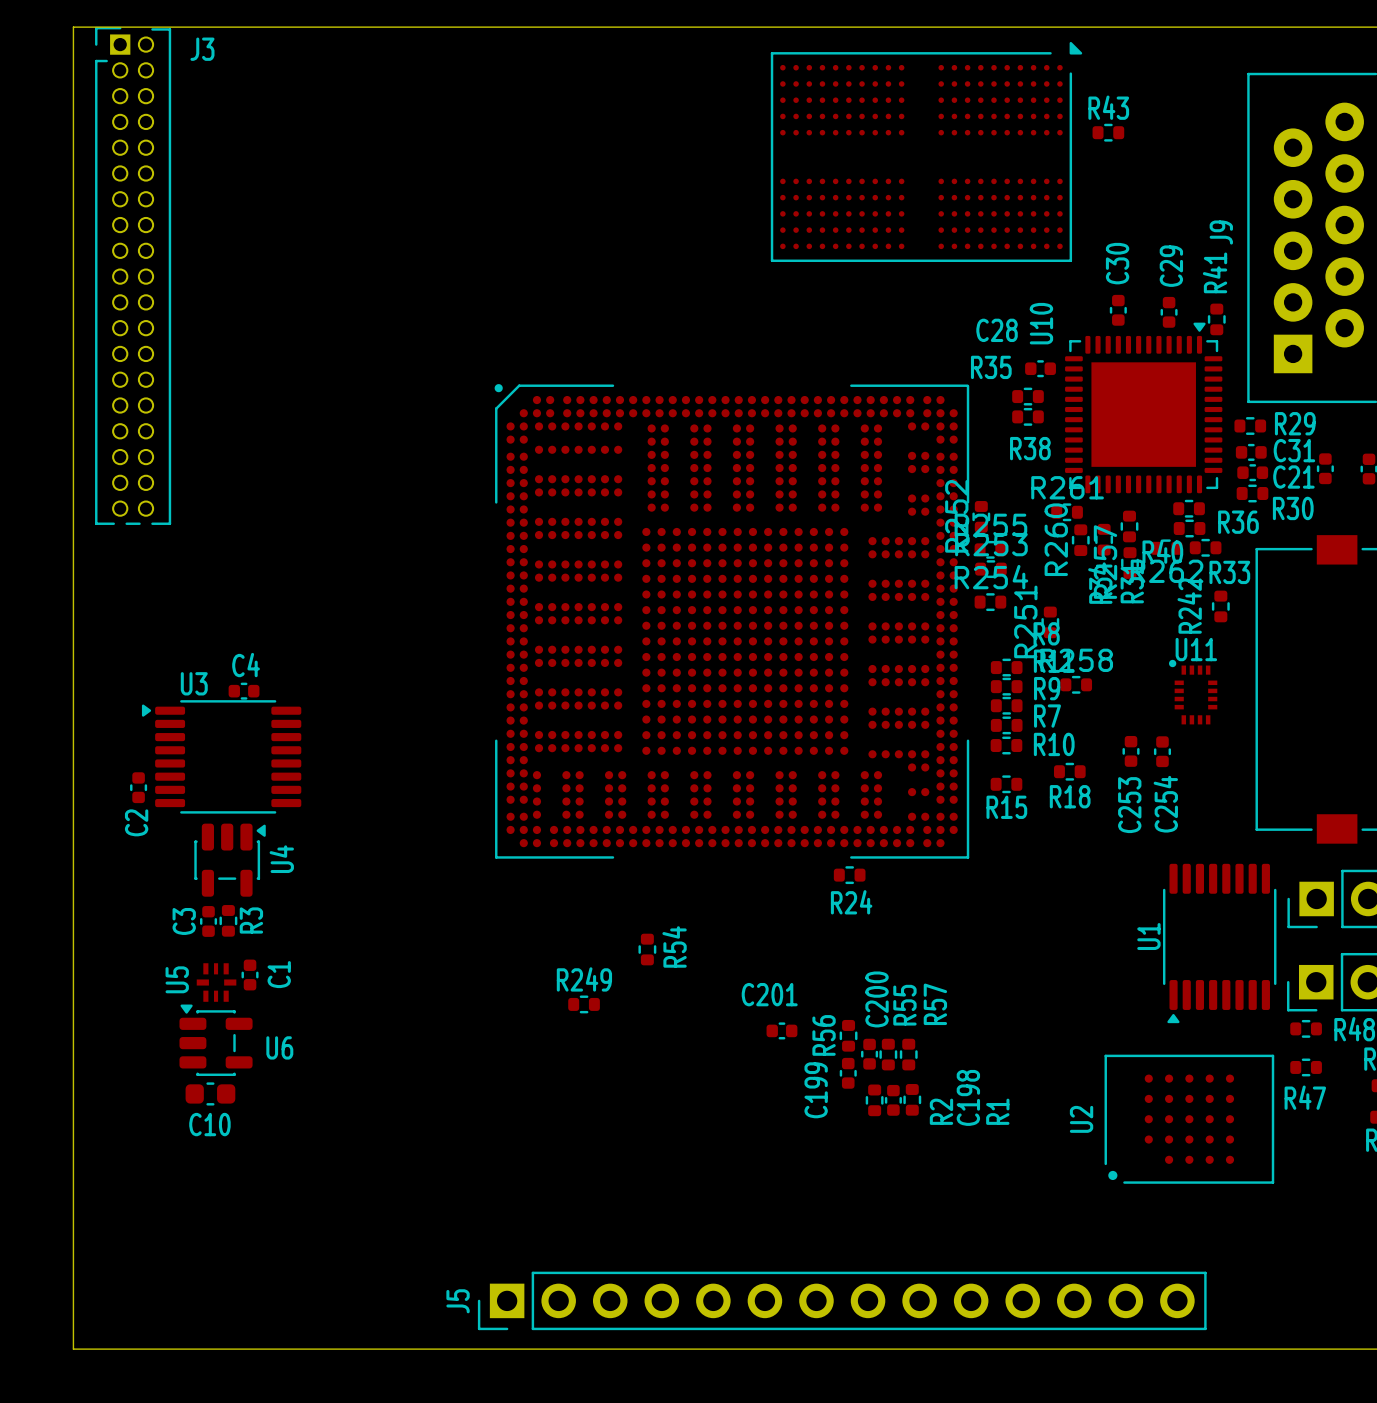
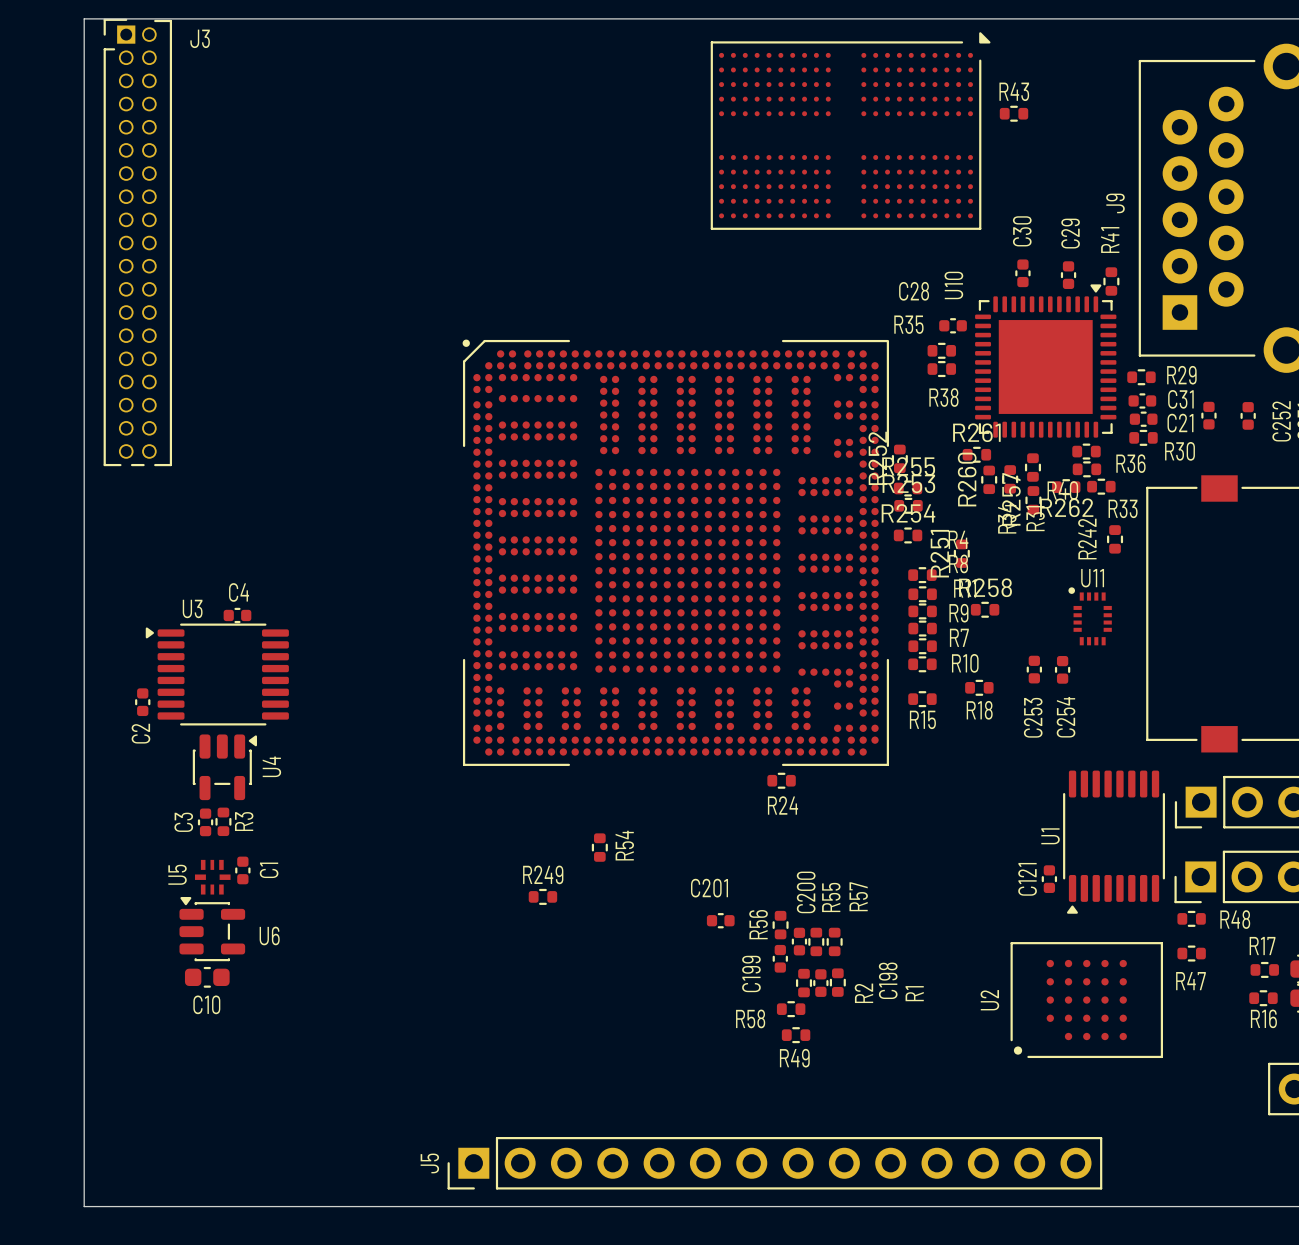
R4: none -> (922, 575)
C121: none -> (1049, 879)
R58: none -> (791, 1009)
R49: none -> (796, 1035)

